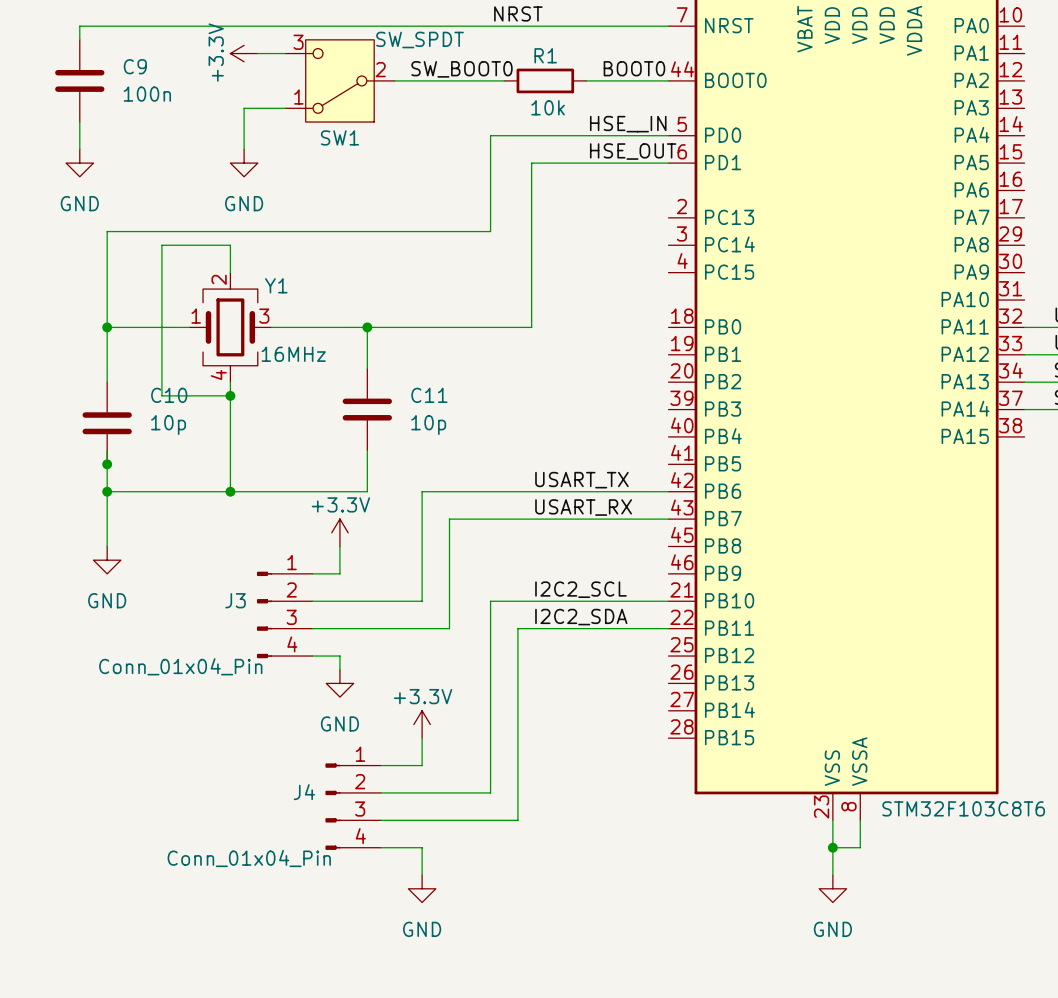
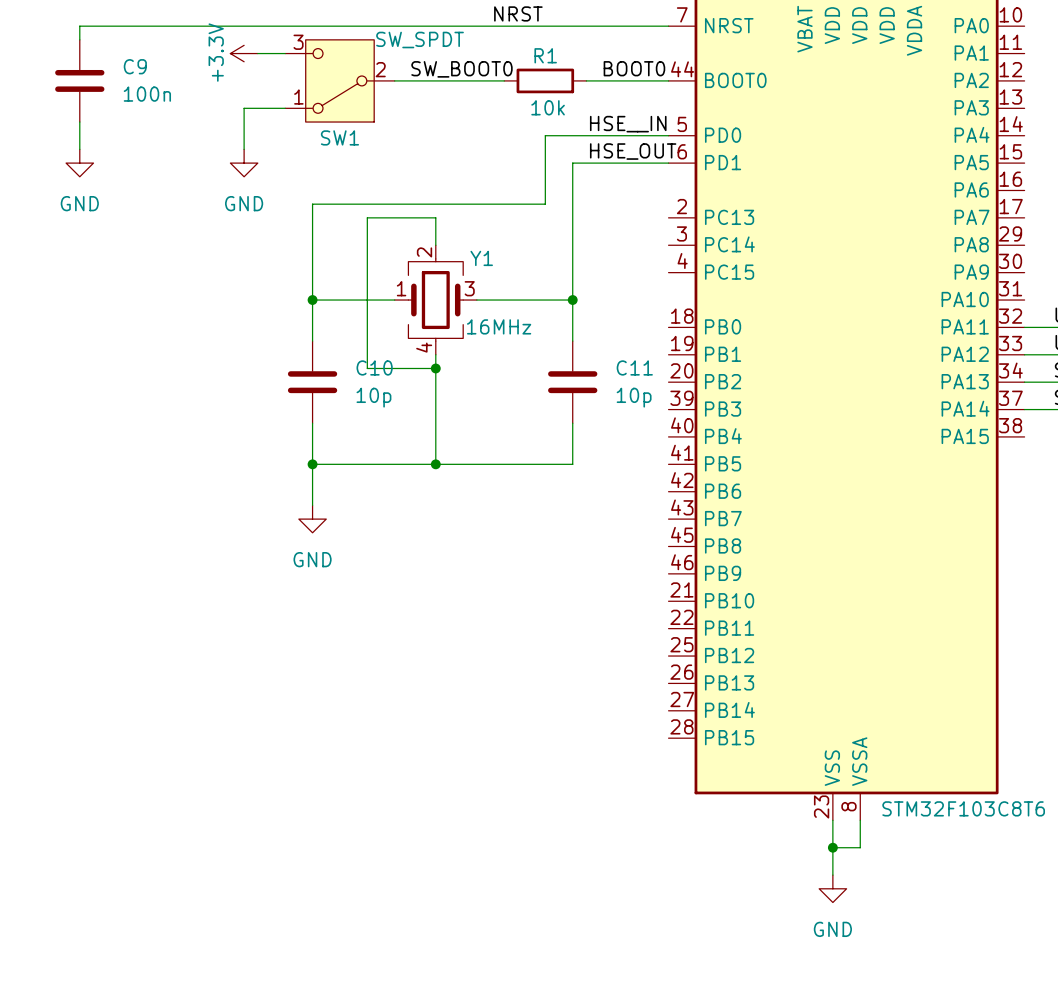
wire: (545, 135) (490, 135) (490, 231) (107, 231) (107, 382) -> (545, 135) (545, 204) (312, 204) (312, 341)
wire: (572, 163) (531, 163) (531, 327) (271, 327) -> (572, 163) (572, 341)
wire: none -> (435, 245) (435, 217) (367, 217) (367, 327)
wire: (230, 272) (230, 245) (161, 245) (161, 395) (230, 395) -> none
junction: none -> (312, 300)
wire: none -> (476, 300) (572, 300)
junction: none -> (572, 300)
wire: (107, 327) (189, 327) -> (312, 300) (394, 300)
junction: (107, 327) -> none
Y1 position: (230, 327) -> (435, 300)
junction: (367, 327) -> none
wire: none -> (367, 368) (435, 368)
junction: none -> (435, 368)
wire: (230, 382) (230, 491) -> (435, 354) (435, 464)
C10 name position: C10 (169, 395) -> C10 (374, 367)
junction: (230, 395) -> none
C11 position: (367, 409) -> (572, 382)
C10 position: (107, 423) -> (312, 382)
wire: none -> (312, 423) (312, 505)
C10 value position: 10p (168, 425) -> 10p (373, 397)
wire: (107, 450) (107, 546) -> none
wire: (367, 450) (367, 491) (107, 491) -> (572, 423) (572, 464) (312, 464)
junction: (107, 464) -> none
junction: none -> (312, 464)
junction: none -> (435, 464)
label: USART_TX (581, 480) -> none
junction: (107, 491) -> none
junction: (230, 491) -> none
wire: (668, 491) (422, 491) (422, 601) (312, 601) -> none
label: USART_RX (583, 507) -> none
power symbol: none -> GND (312, 519)
wire: (668, 519) (449, 519) (449, 628) (312, 628) -> none
power symbol: +3.3V (339, 532) -> none
wire: (339, 546) (339, 573) (312, 573) -> none
power symbol: GND (107, 560) -> none
label: I2C2_SCL (580, 589) -> none
wire: (668, 601) (490, 601) (490, 792) (381, 792) -> none
J3: Conn_01x04_Pin (284, 614) -> none
label: I2C2_SDA (581, 617) -> none
wire: (668, 628) (517, 628) (517, 820) (381, 820) -> none
wire: (312, 656) (339, 656) (339, 669) -> none
power symbol: GND (339, 683) -> none
power symbol: +3.3V (422, 724) -> none
wire: (422, 738) (422, 765) (381, 765) -> none
J4: Conn_01x04_Pin (353, 806) -> none
wire: (381, 847) (422, 847) (422, 875) -> none
power symbol: GND (422, 888) -> none

